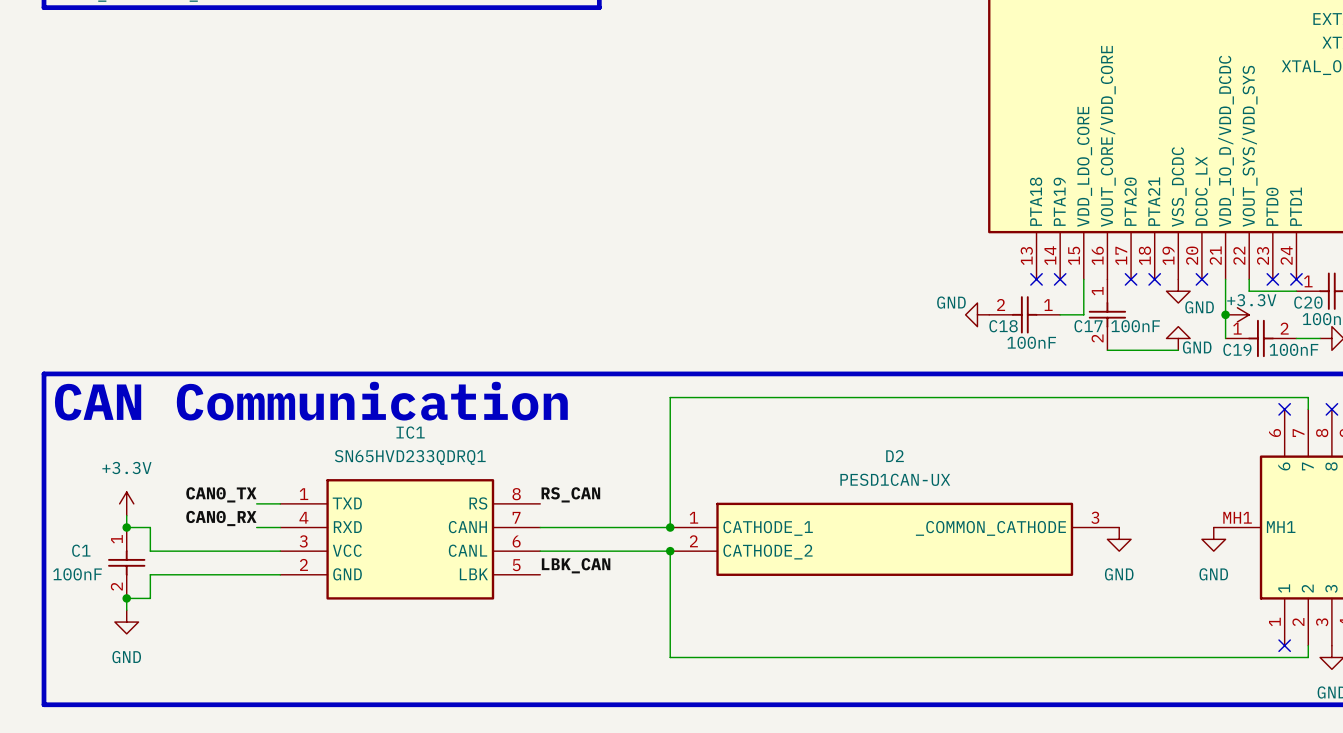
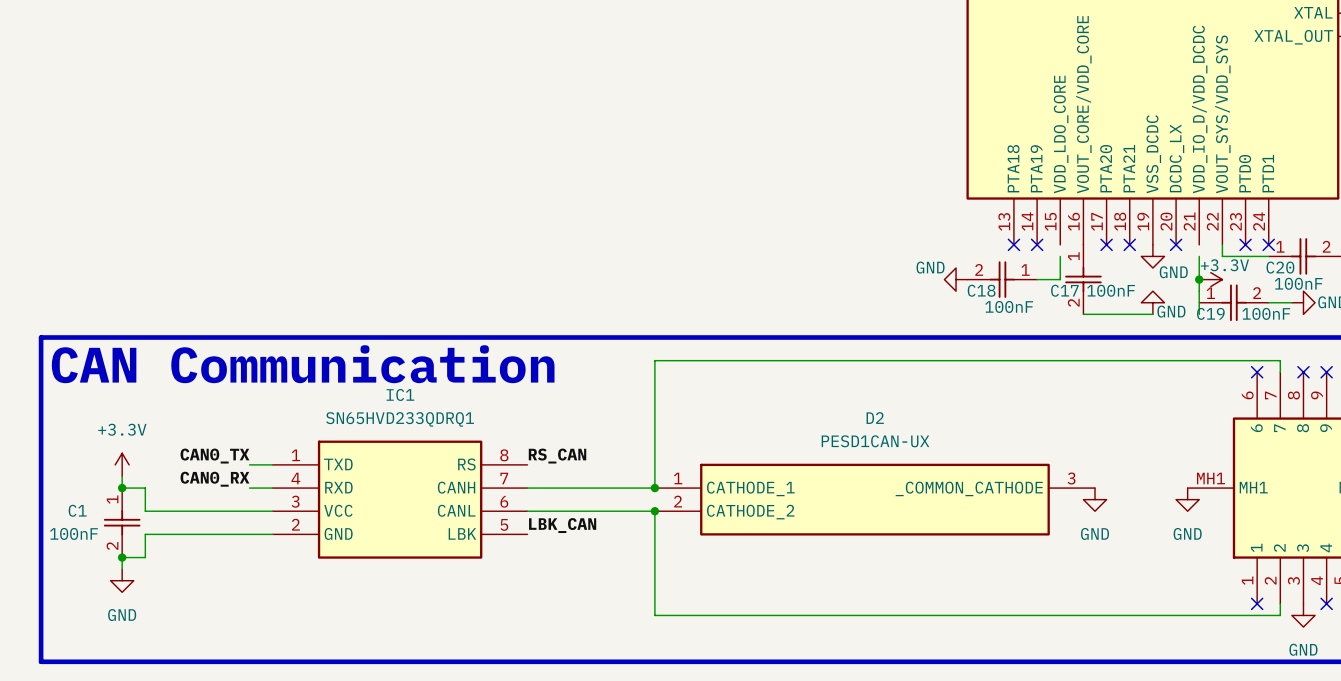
wire: (1083, 279) (1083, 291) -> none
wire: (1225, 279) (1225, 291) -> (1199, 302) (1199, 314)

